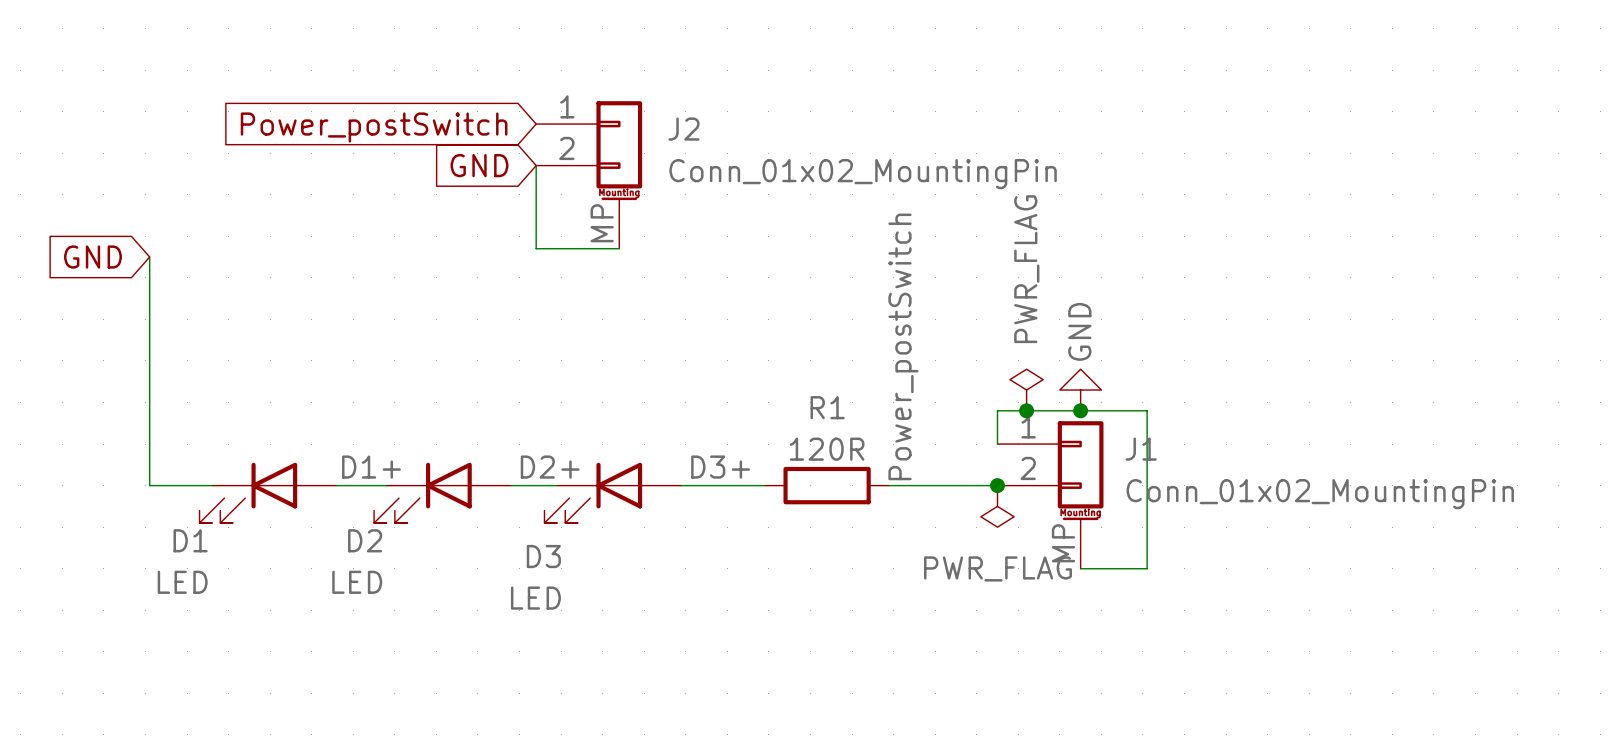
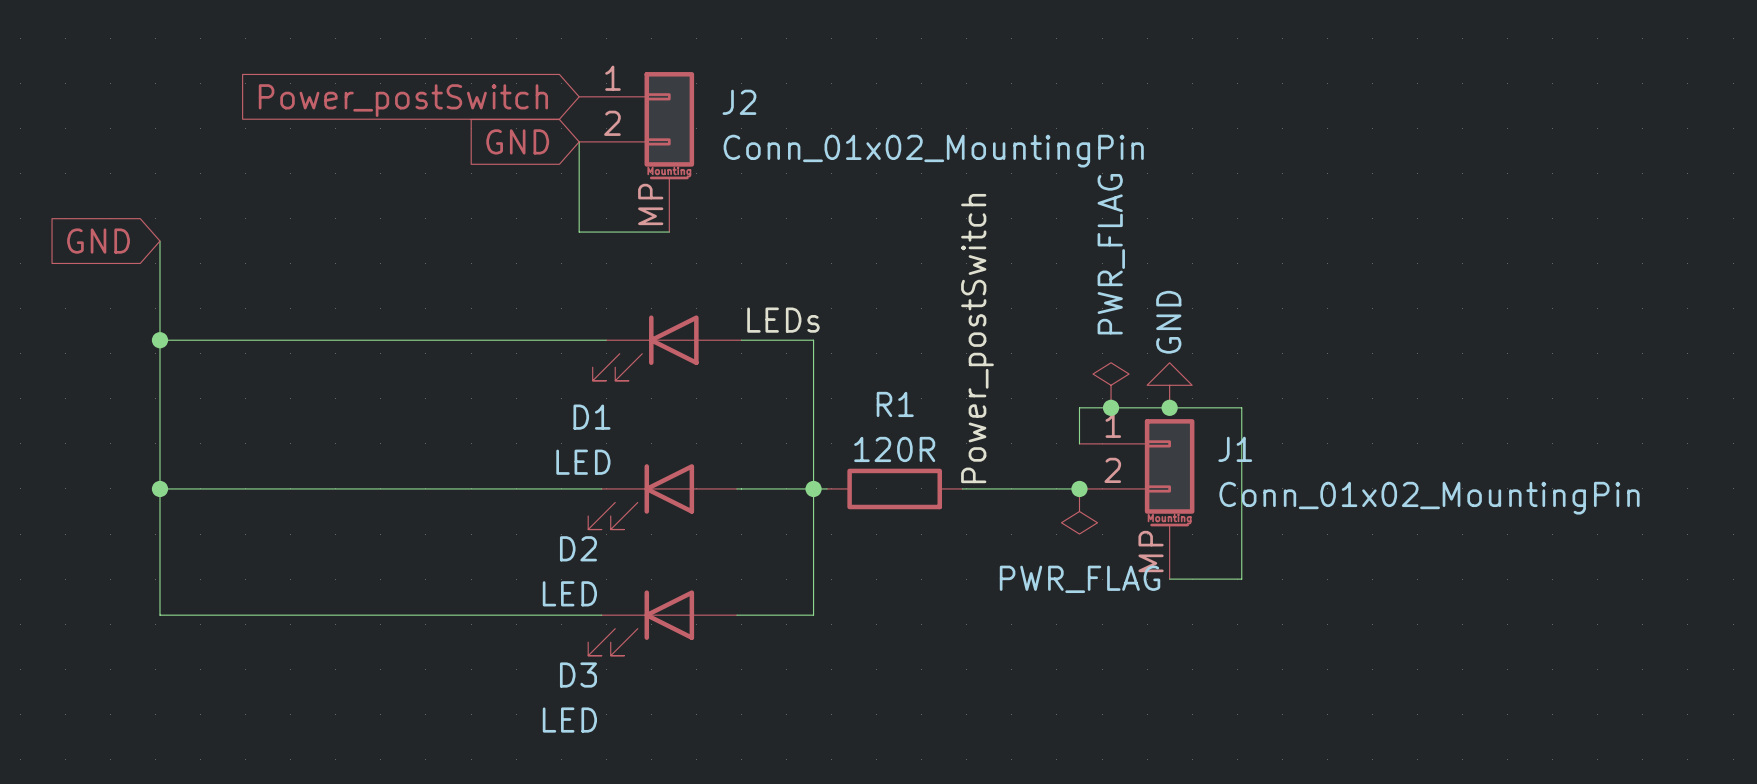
label: none -> LEDs (783, 320)
wire: none -> (159, 340) (606, 340)
junction: none -> (159, 340)
wire: none -> (741, 340) (813, 340) (813, 615) (736, 615)
label: D1+ (371, 467) -> none
label: D2+ (550, 467) -> none
label: D3+ (720, 467) -> none
wire: none -> (159, 488) (159, 615) (601, 615)
junction: none -> (159, 488)
junction: none -> (813, 488)
D1 position: (268, 492) -> (667, 348)
D2: LED (442, 492) -> none
D1 name position: D1 (190, 540) -> D1 (591, 417)
D3 name: D3 (543, 556) -> D2 (578, 548)
D1 value position: LED (182, 582) -> LED (583, 462)
D3 value position: LED (535, 598) -> LED (569, 593)
D3: none -> LED (662, 623)

